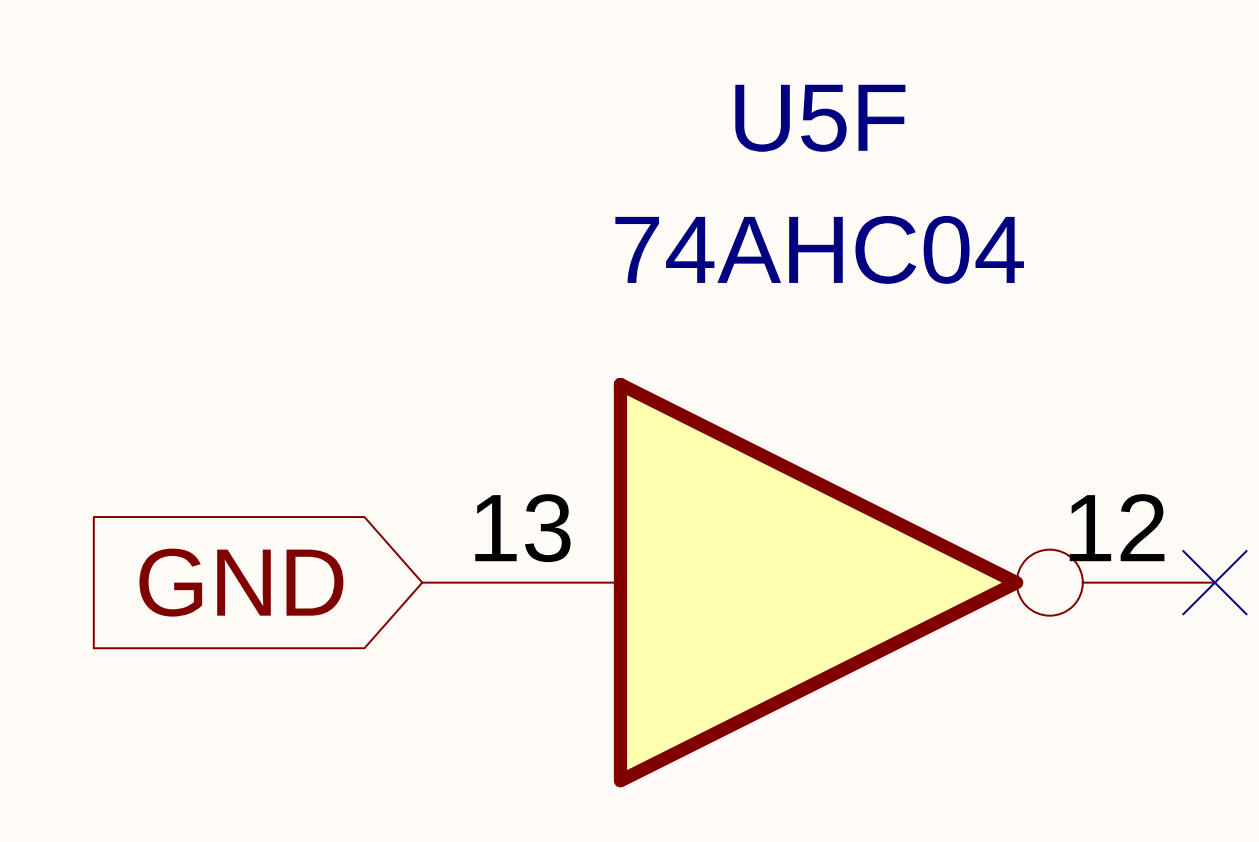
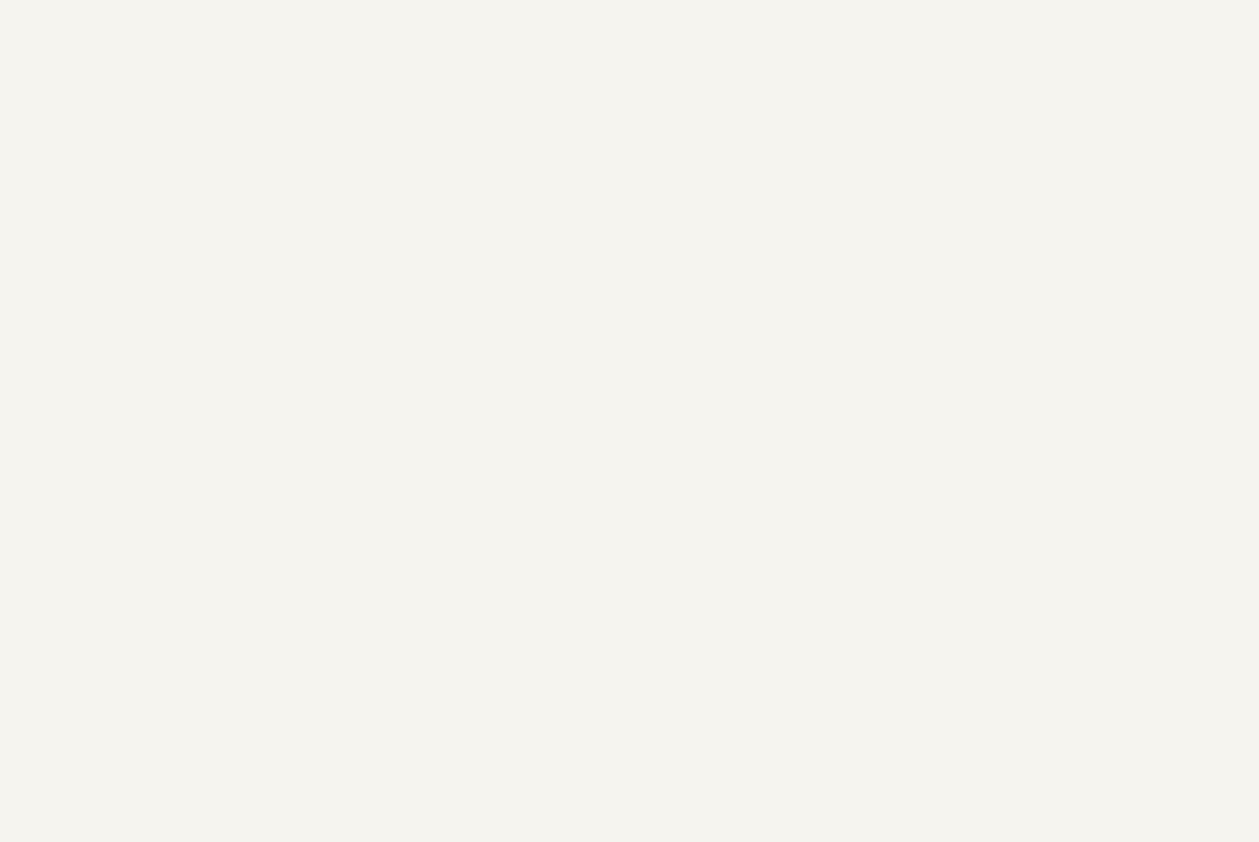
global label: GND (241, 582) -> none
U5F: 74AHC04 (818, 582) -> none
no-connect mark: (1214, 582) -> none

